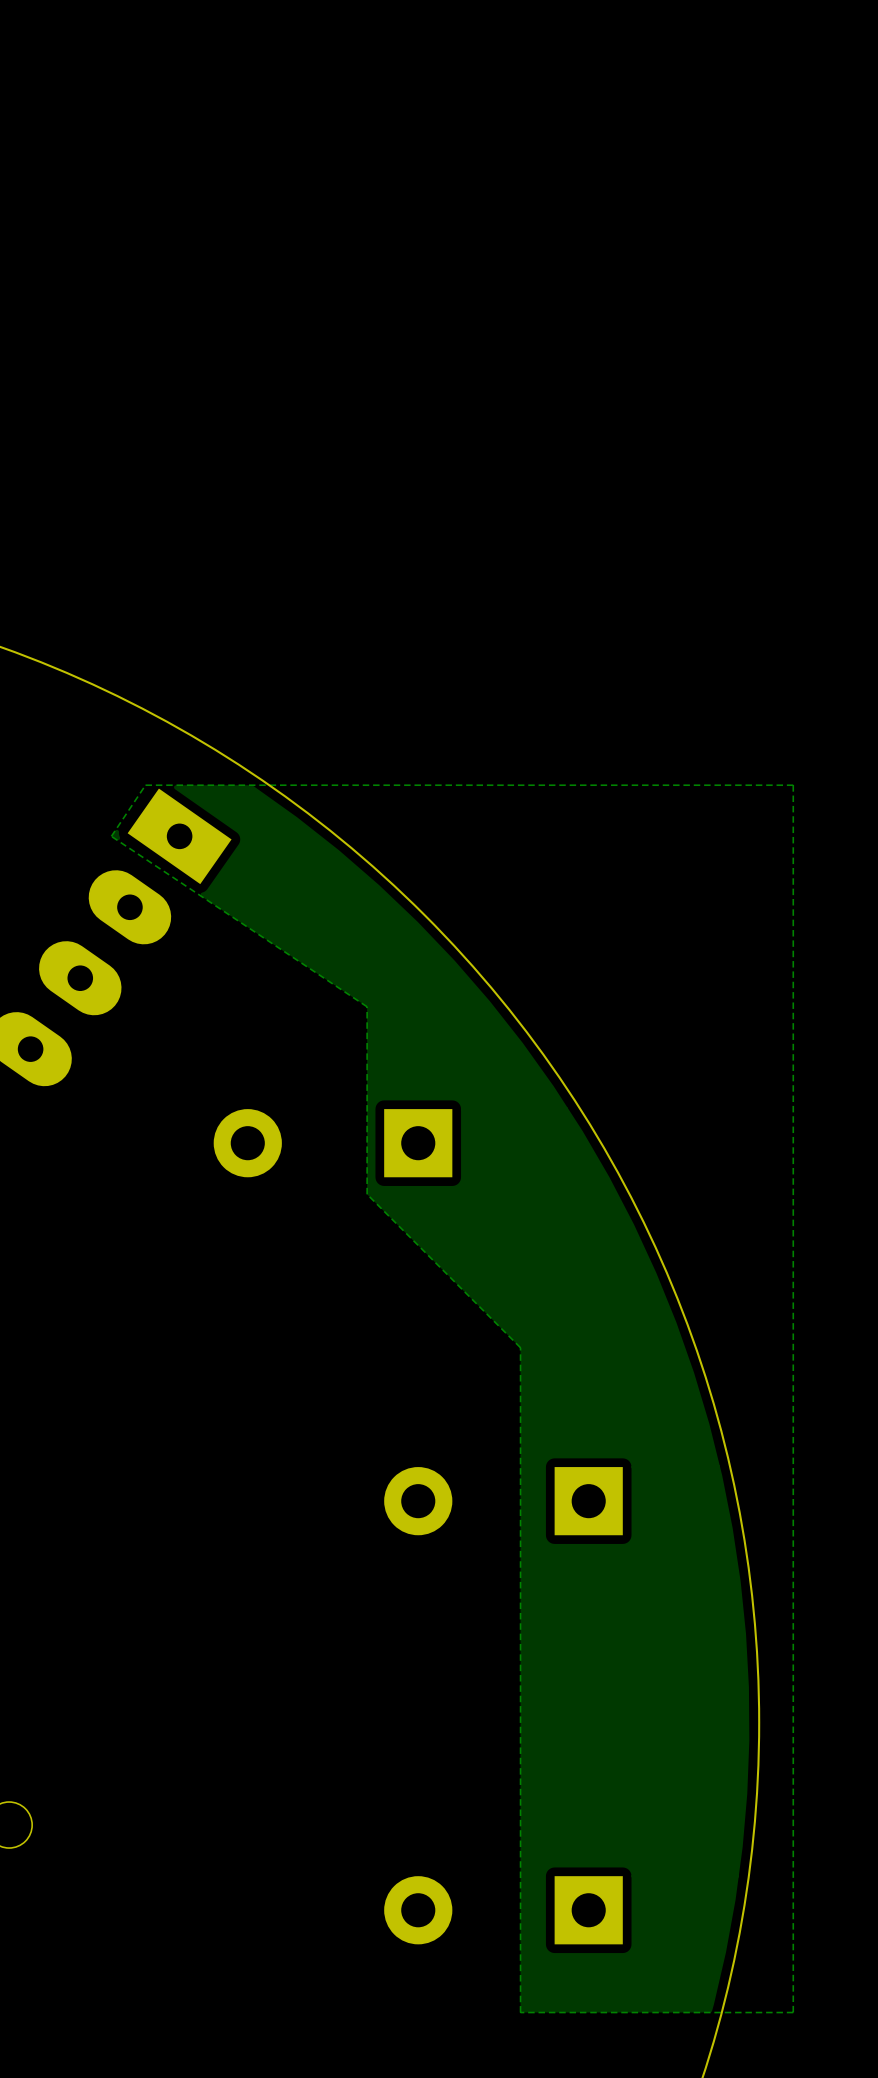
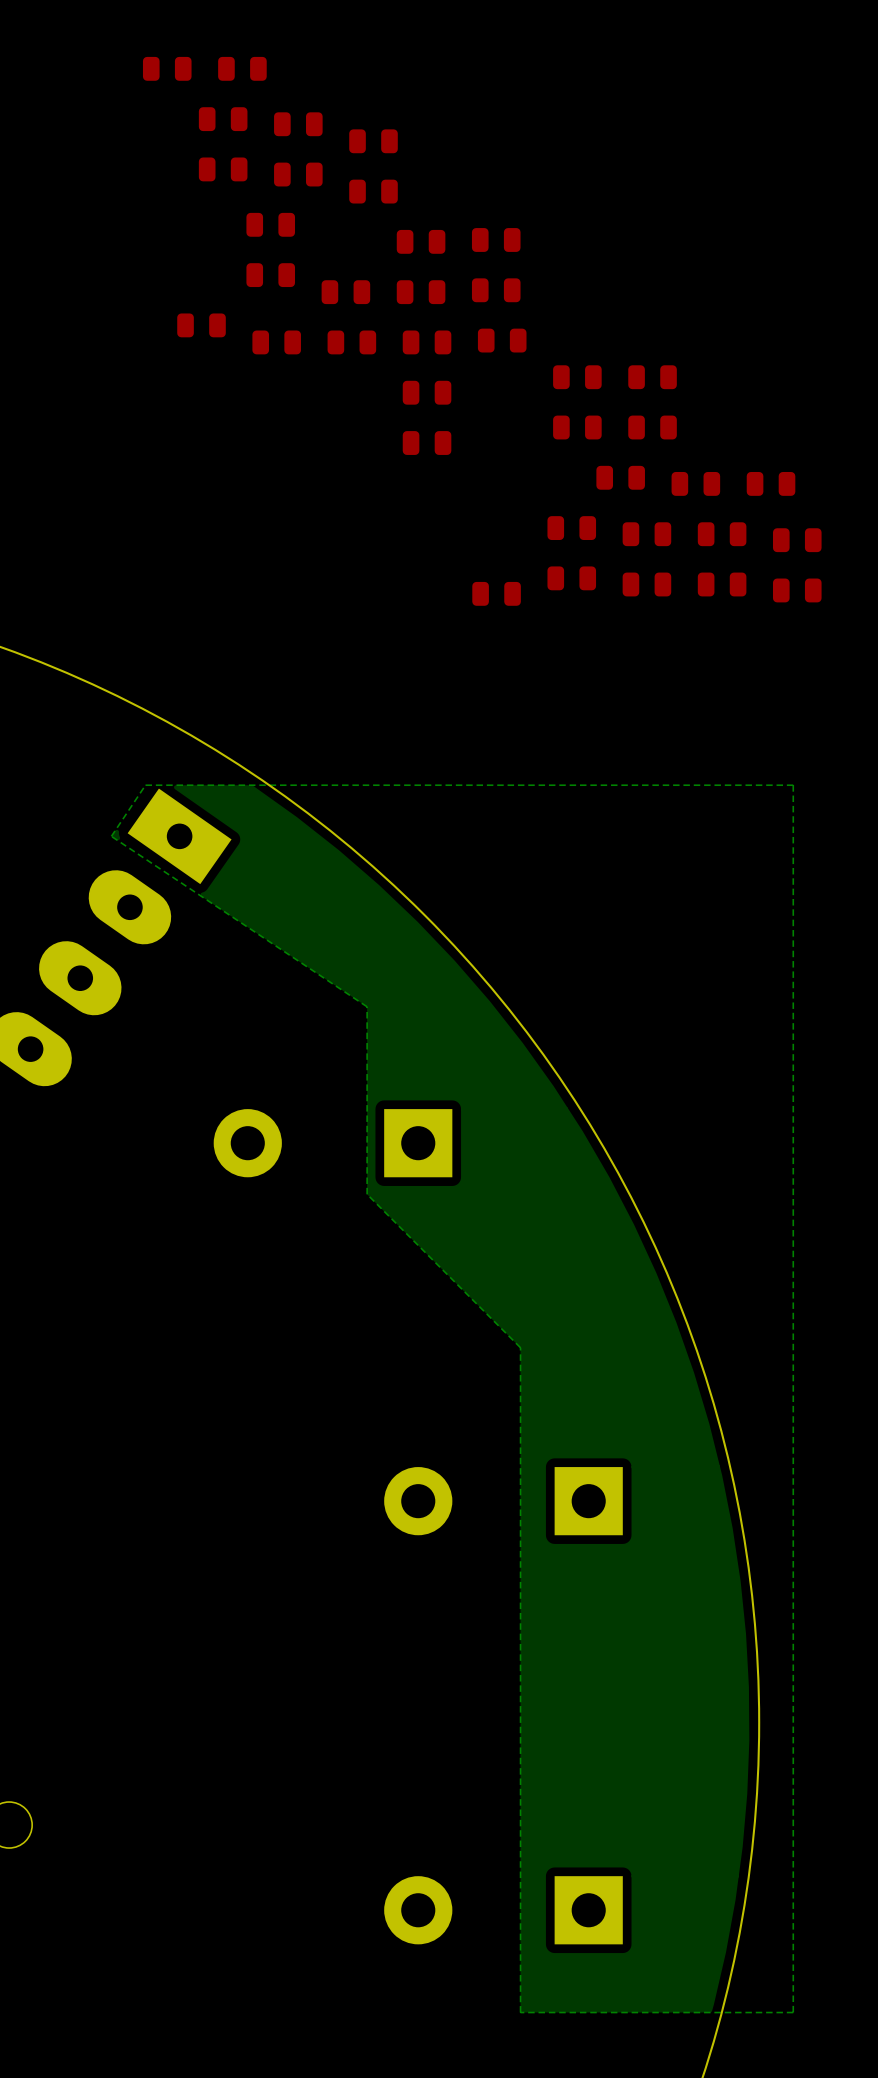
part: none -> (167, 68)
part: none -> (242, 68)
part: none -> (223, 119)
part: none -> (298, 124)
part: none -> (373, 141)
part: none -> (223, 169)
part: none -> (298, 174)
part: none -> (373, 191)
part: none -> (270, 224)
part: none -> (496, 239)
part: none -> (421, 241)
part: none -> (270, 275)
part: none -> (496, 290)
part: none -> (345, 292)
part: none -> (421, 292)
part: none -> (201, 325)
part: none -> (502, 340)
part: none -> (276, 342)
part: none -> (351, 342)
part: none -> (427, 342)
part: none -> (577, 377)
part: none -> (652, 377)
part: none -> (427, 392)
part: none -> (577, 427)
part: none -> (652, 427)
part: none -> (427, 443)
part: none -> (620, 477)
part: none -> (695, 483)
part: none -> (771, 483)
part: none -> (571, 528)
part: none -> (646, 534)
part: none -> (722, 534)
part: none -> (797, 540)
part: none -> (571, 578)
part: none -> (646, 584)
part: none -> (722, 584)
part: none -> (797, 590)
part: none -> (496, 593)

